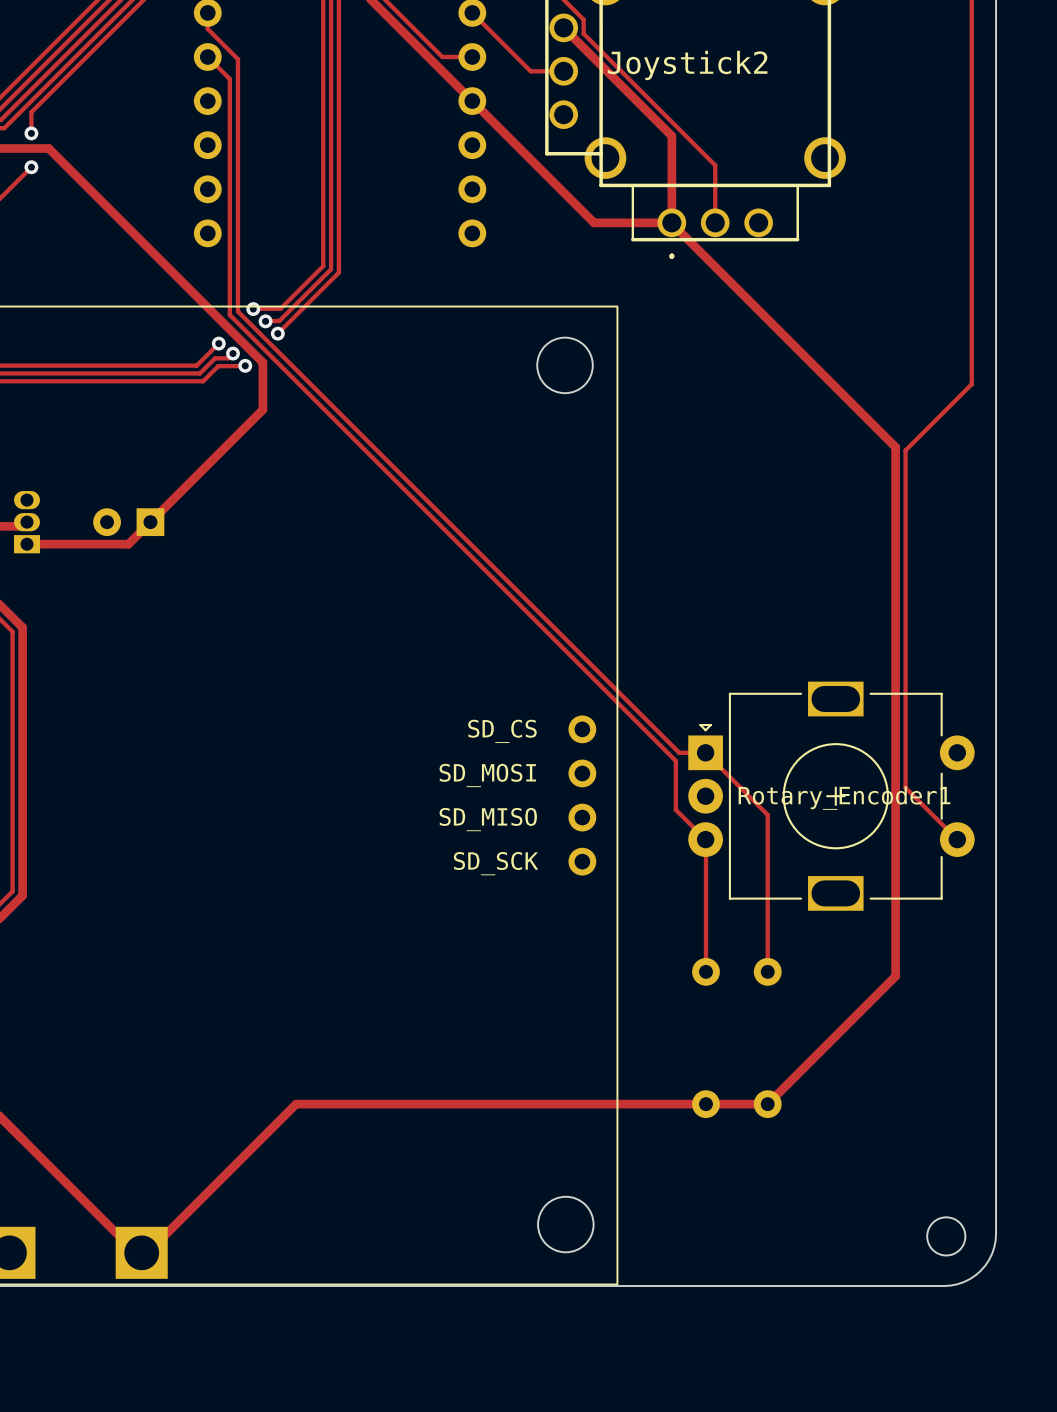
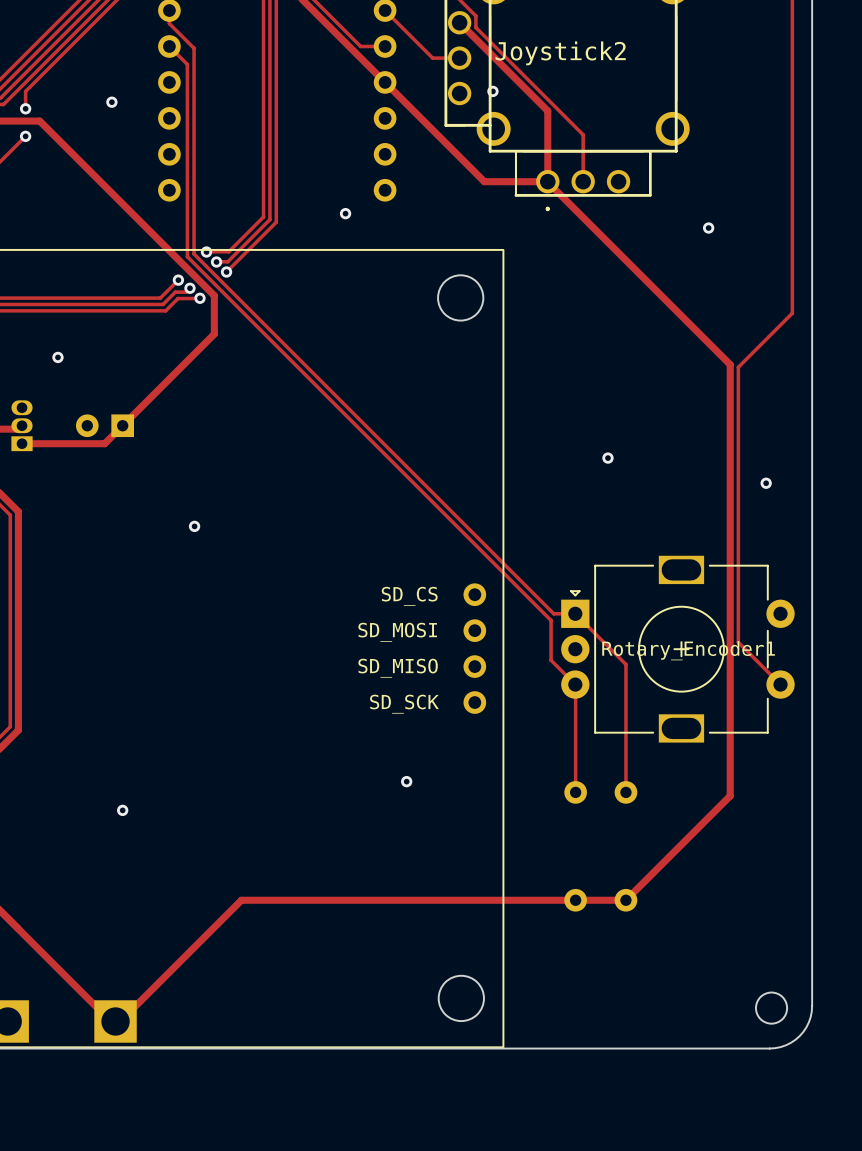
via: none -> (492, 91)
via: none -> (111, 102)
via: none -> (345, 213)
via: none -> (708, 228)
via: none -> (57, 357)
via: none -> (607, 458)
via: none -> (766, 483)
via: none -> (194, 526)
via: none -> (406, 781)
via: none -> (122, 810)

